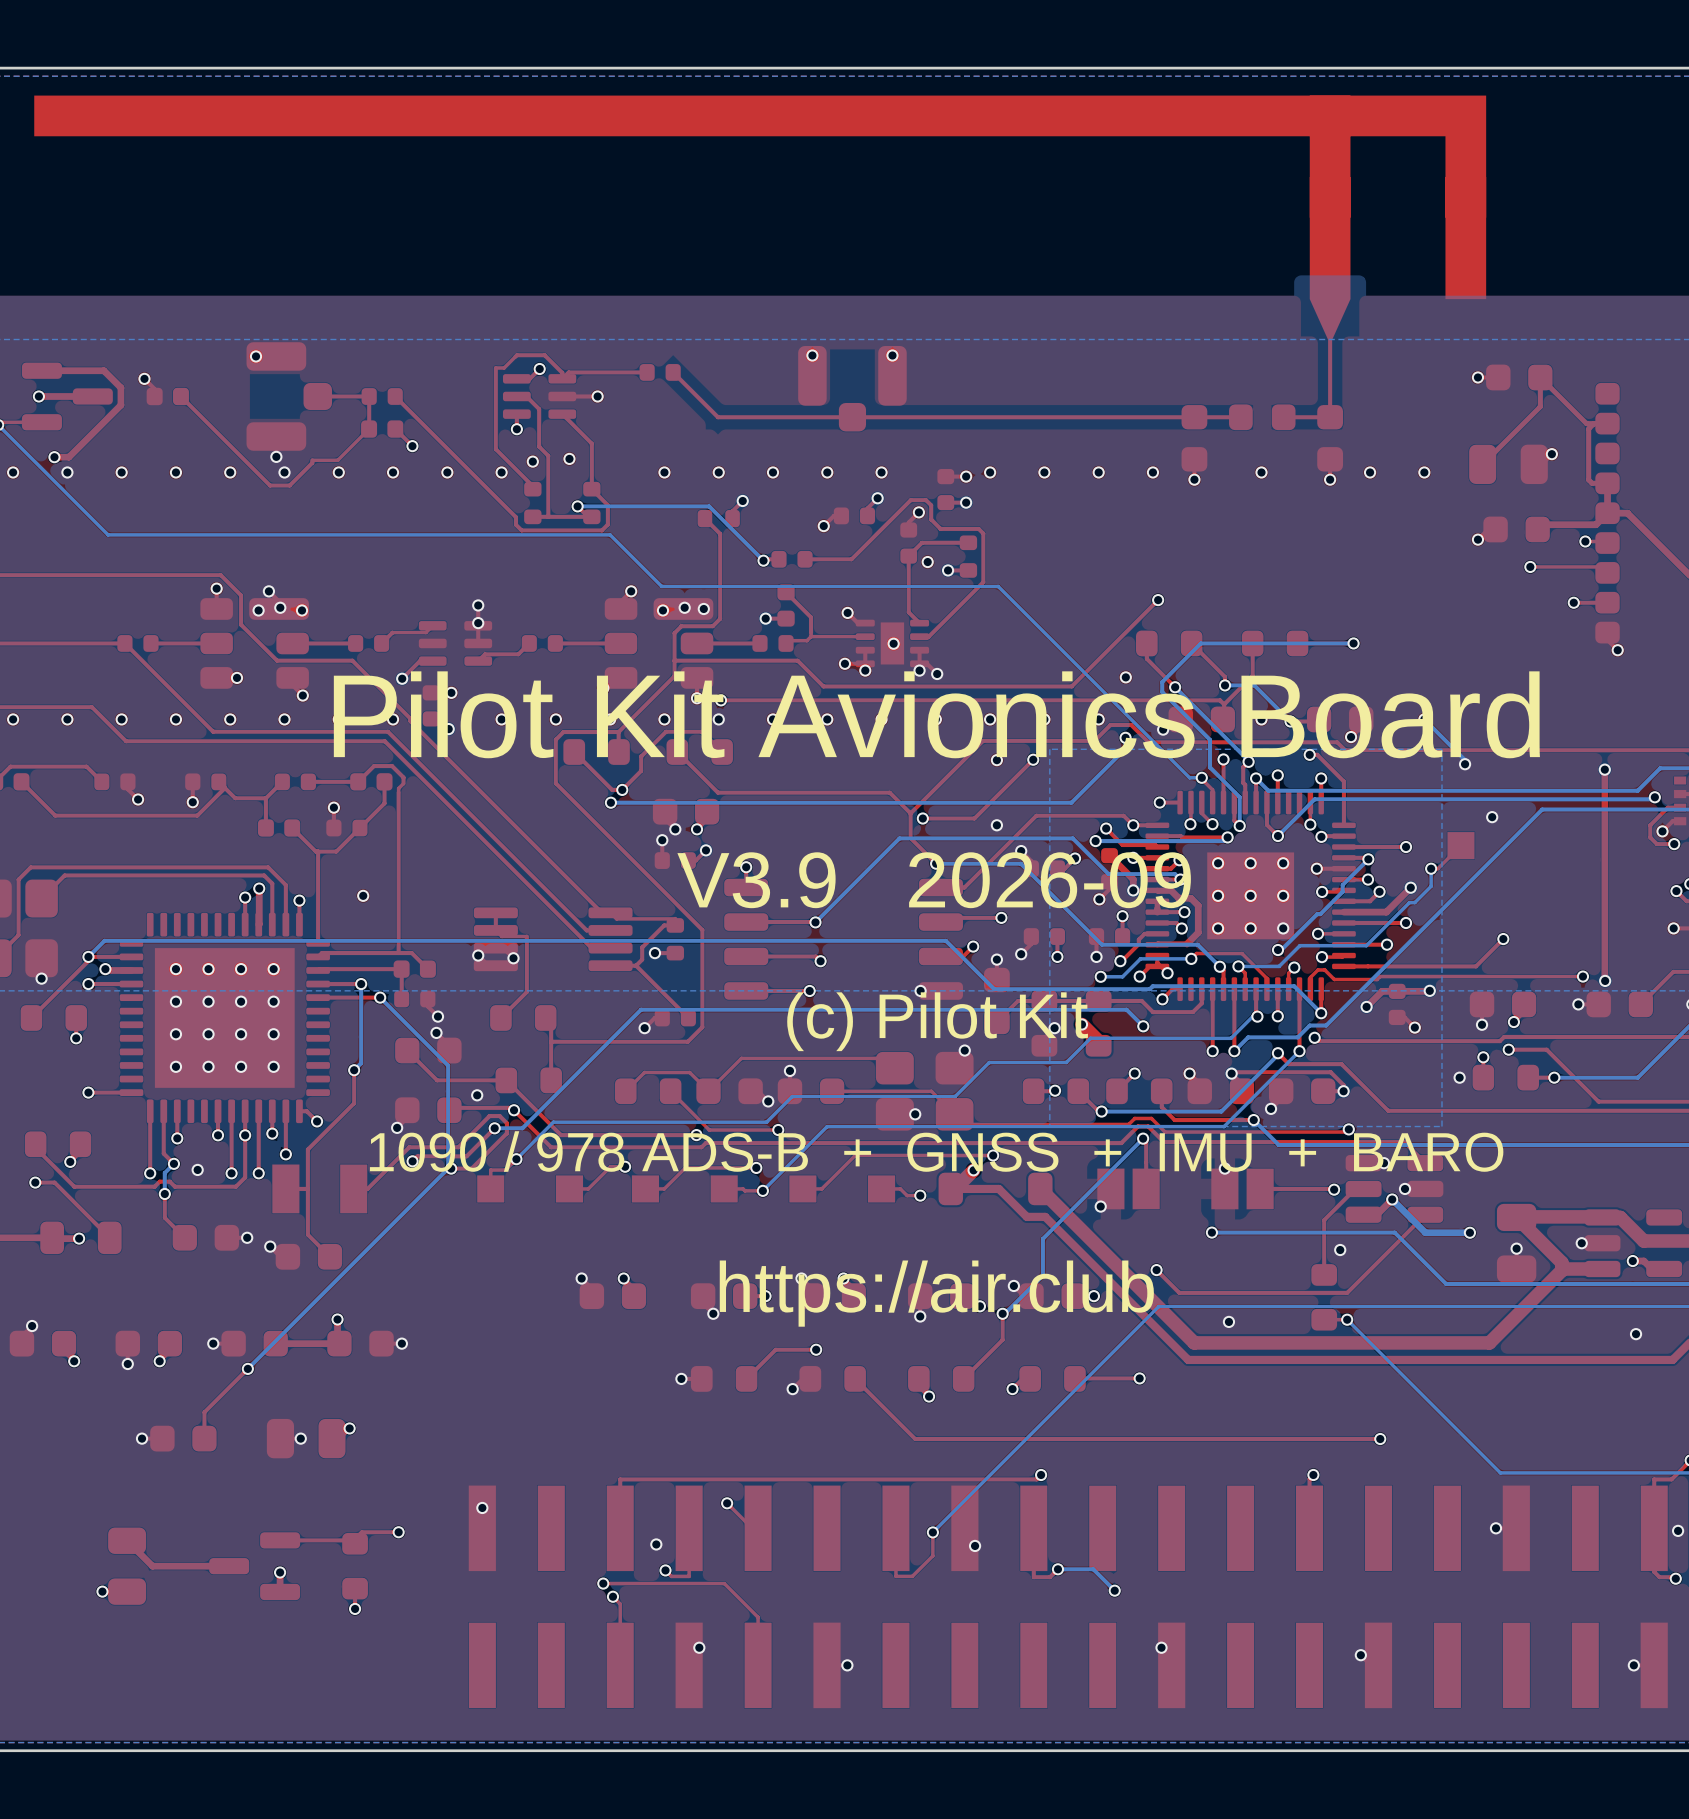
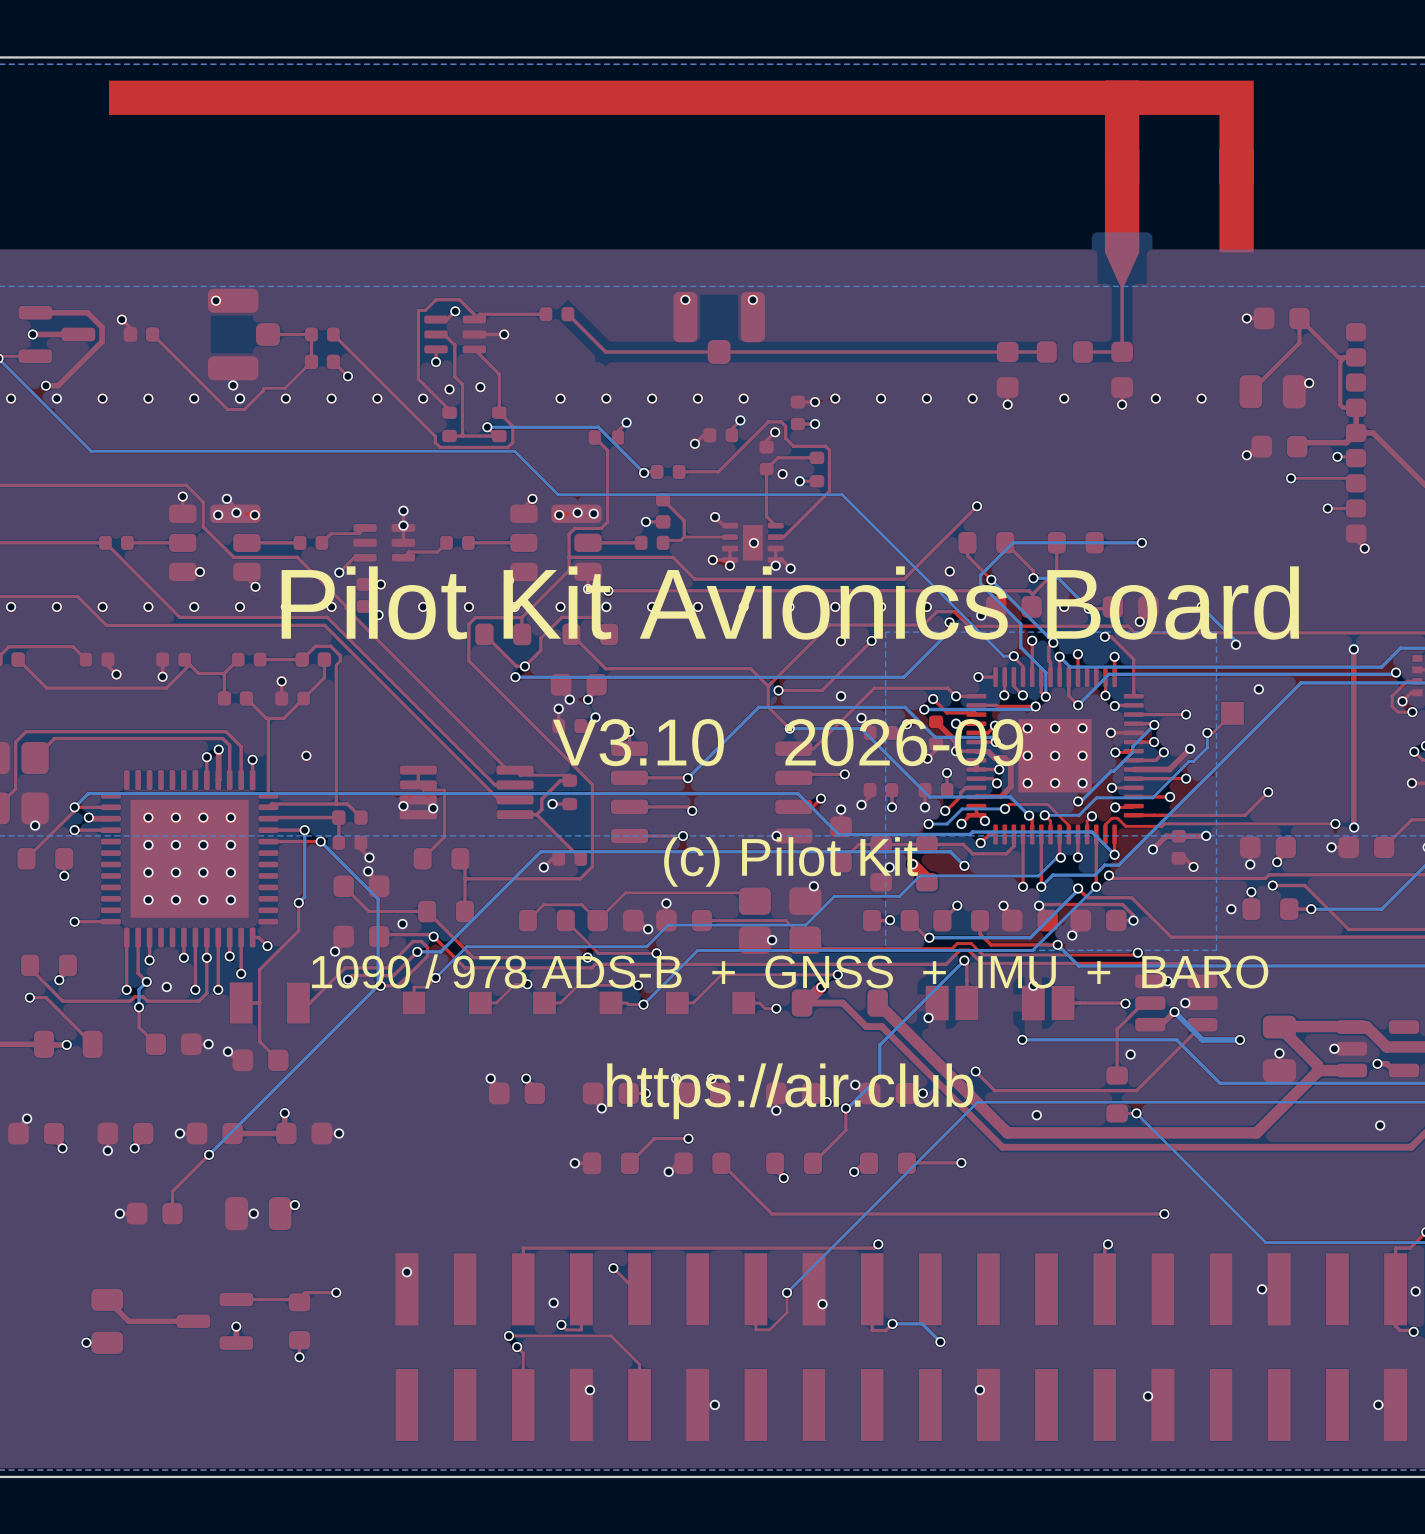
part: (760, 217) -> none
part: none -> (681, 183)
text: V3.9 2026-09 (934, 880) -> V3.10 2026-09 (788, 742)

